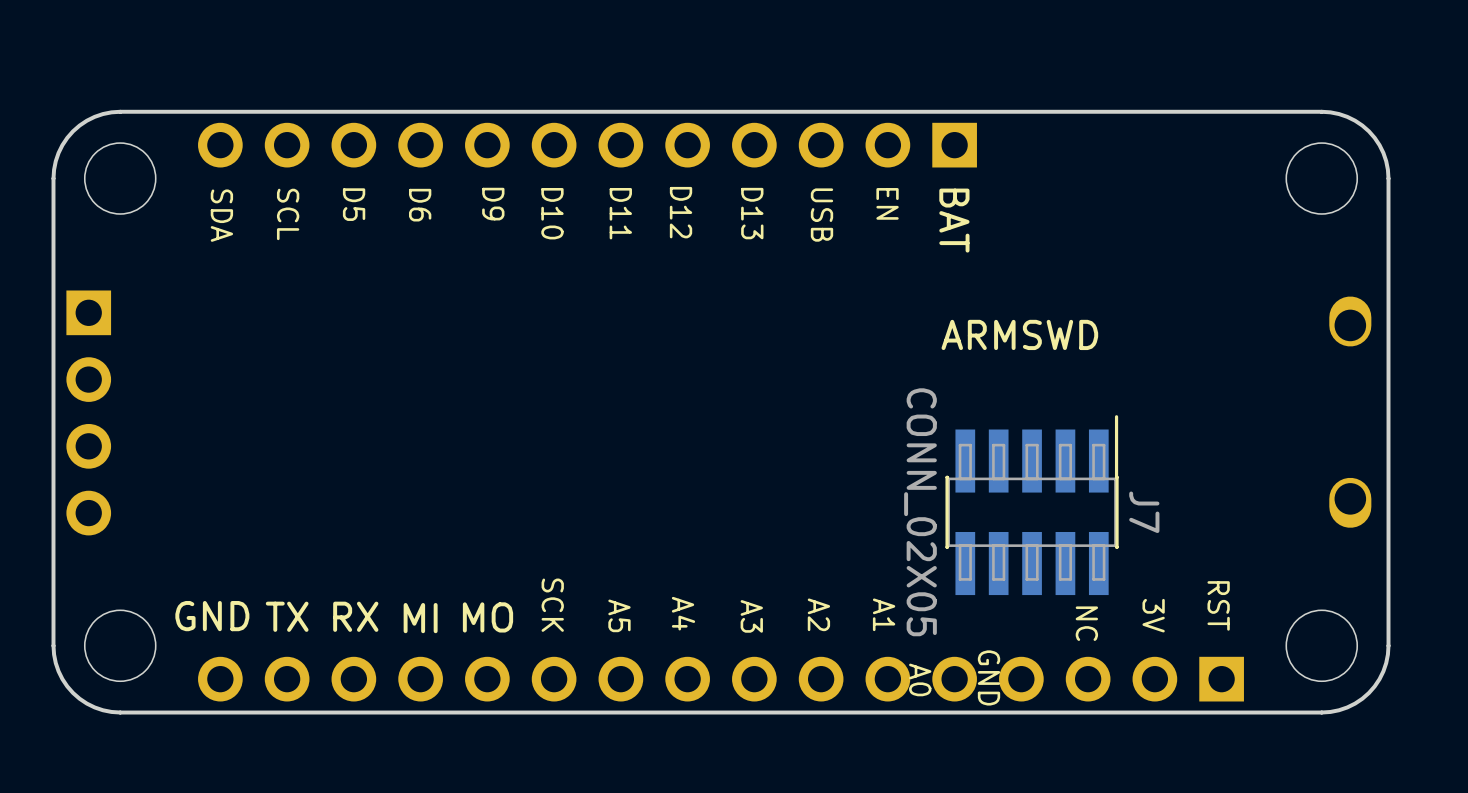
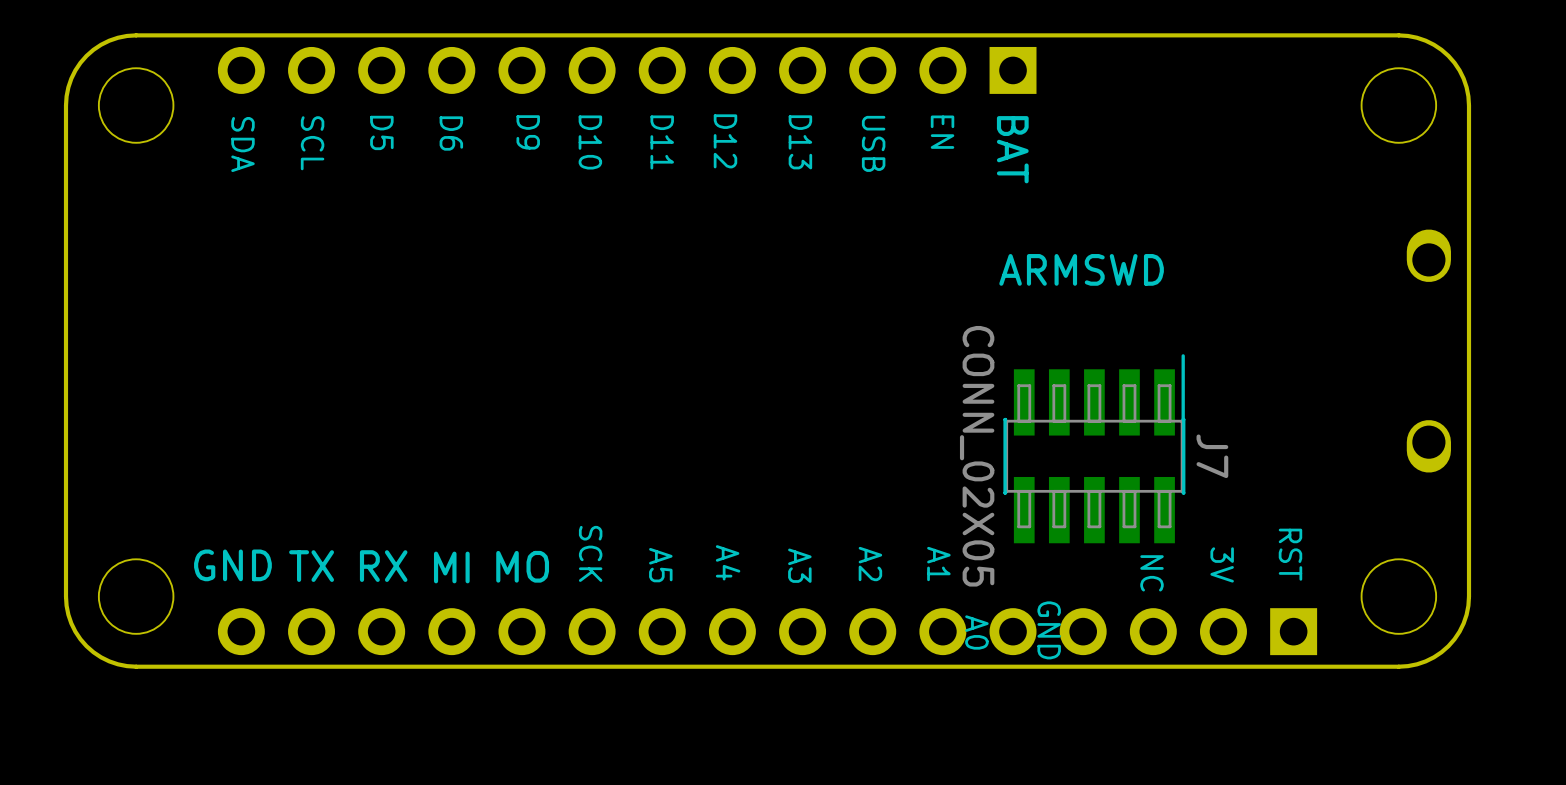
part: (88, 412) -> none

